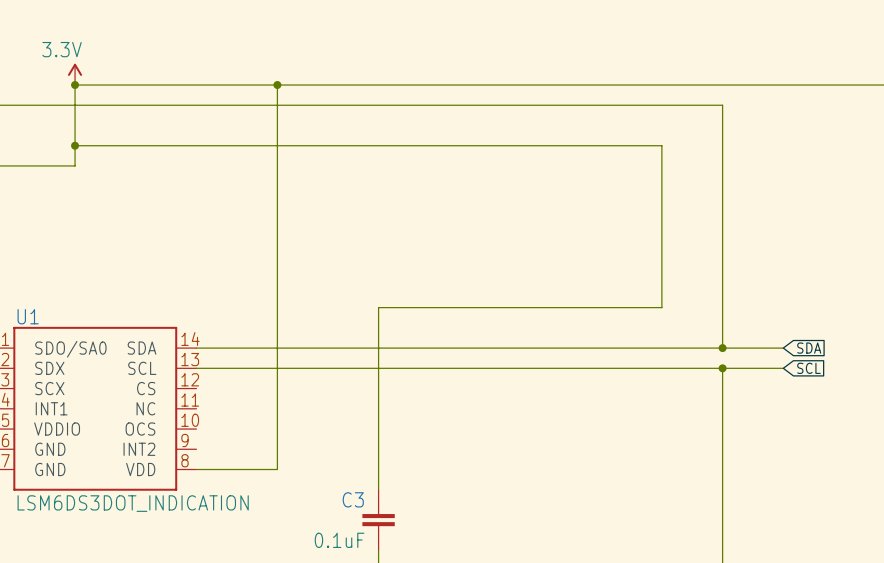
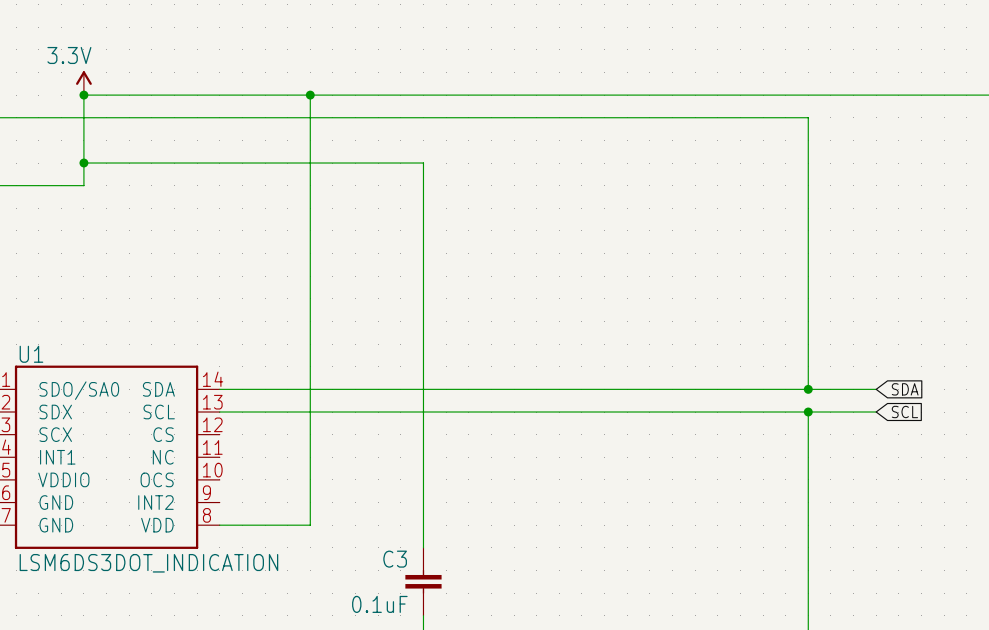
wire: (378, 145) (661, 145) (661, 307) (378, 307) -> (423, 163) (423, 344)

